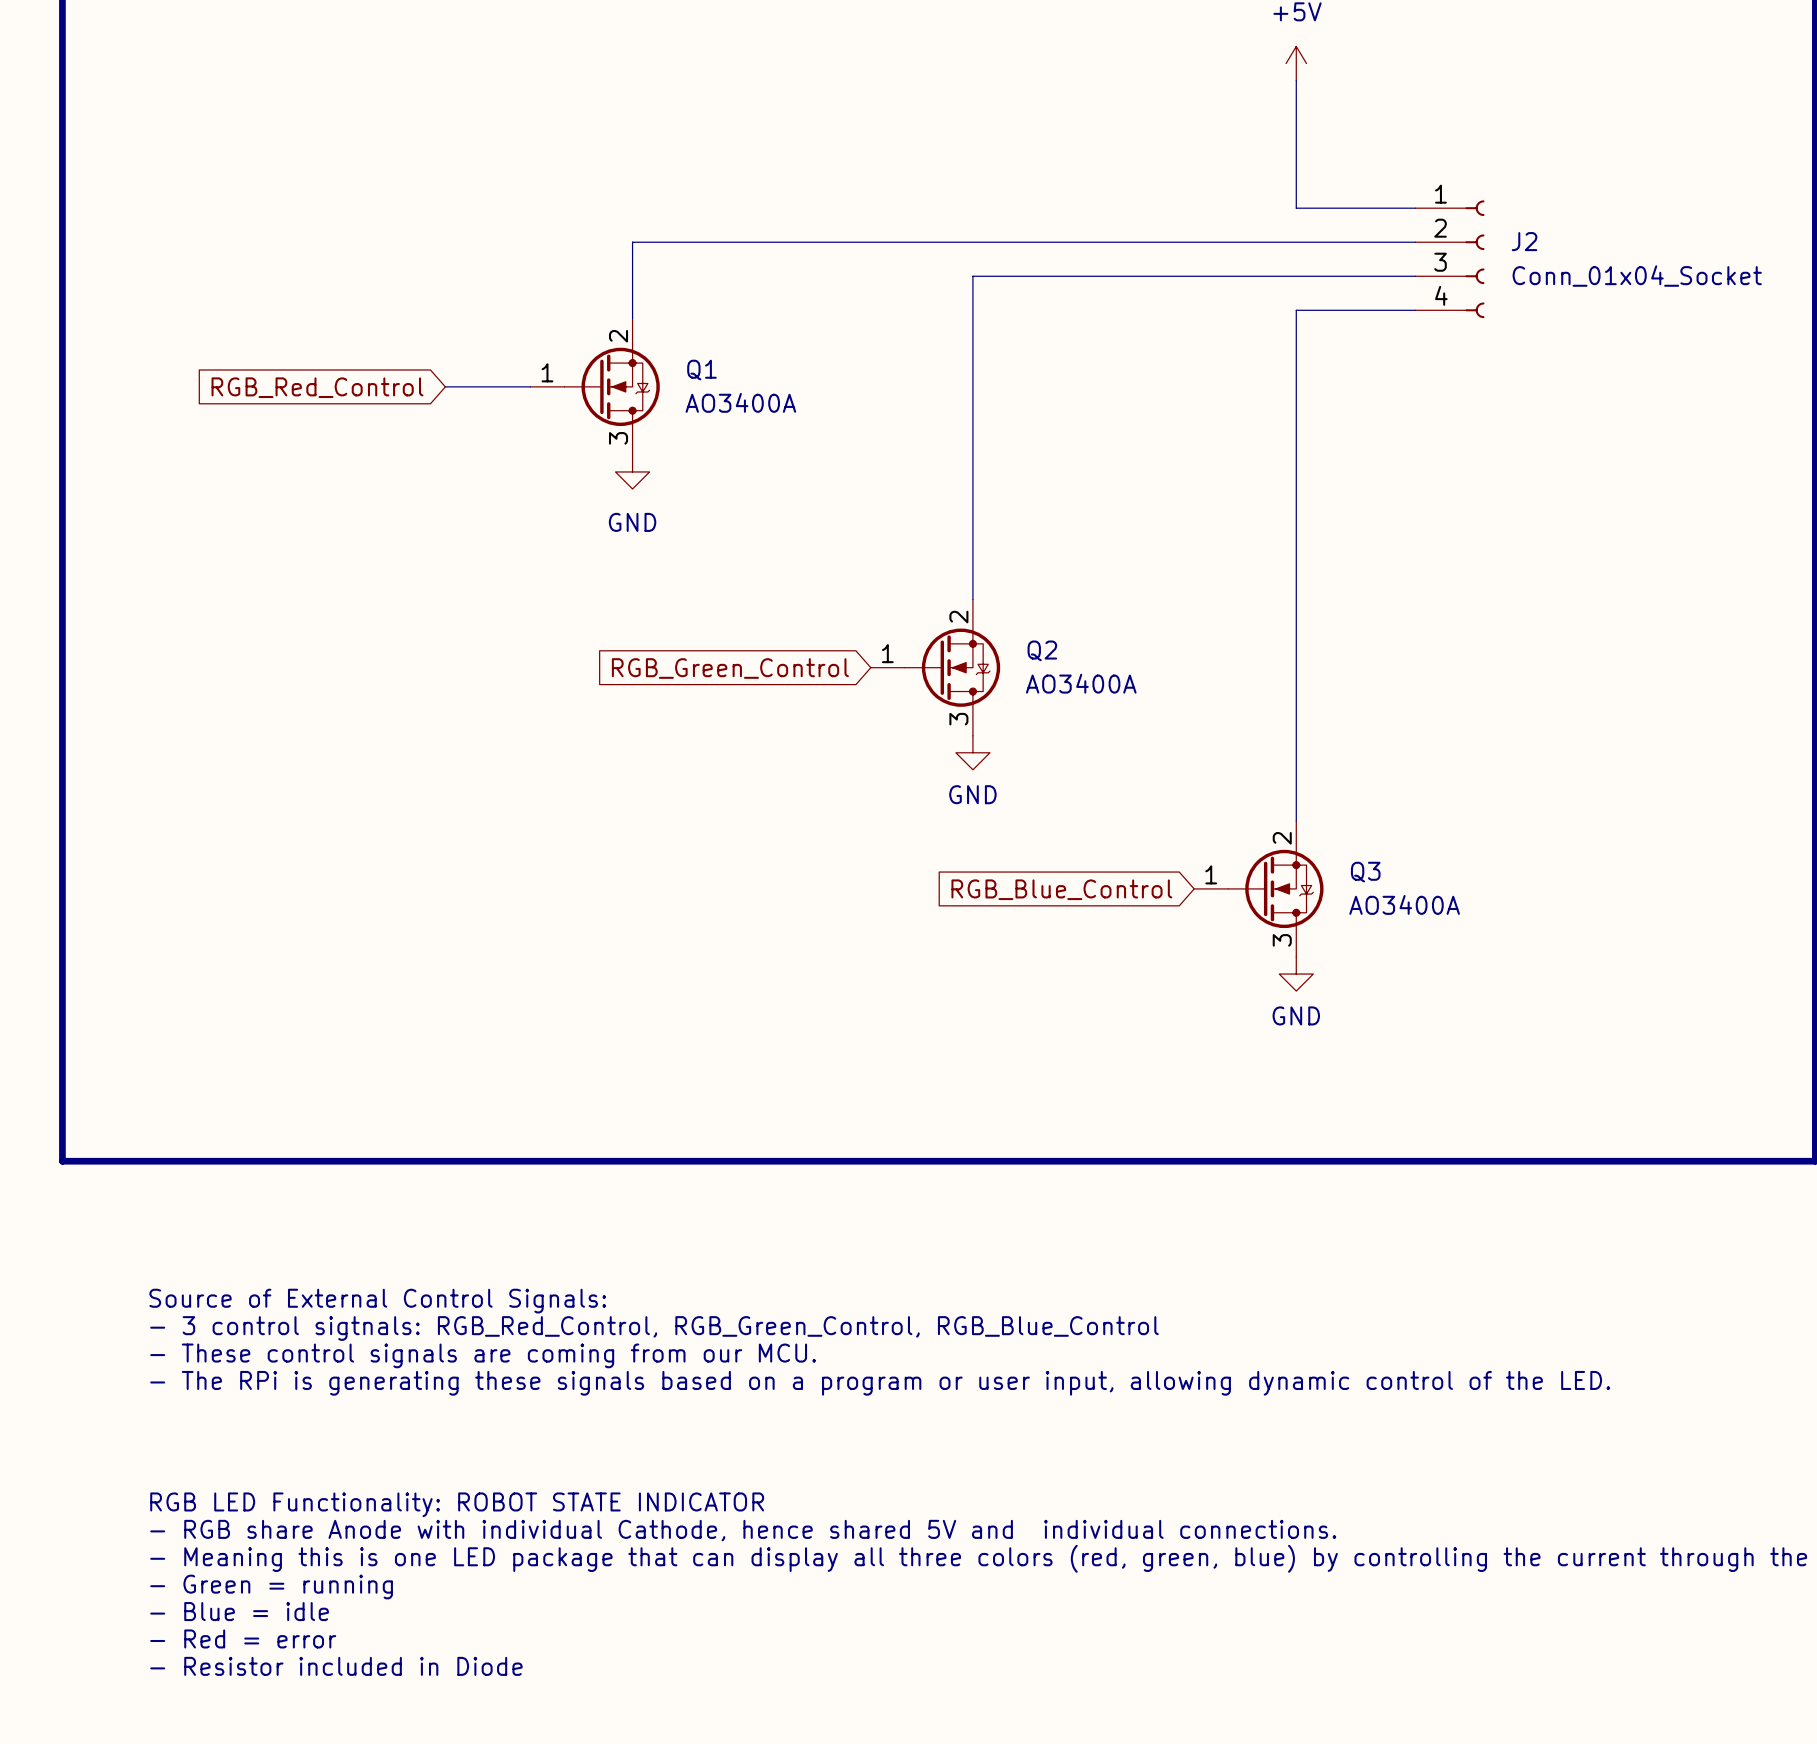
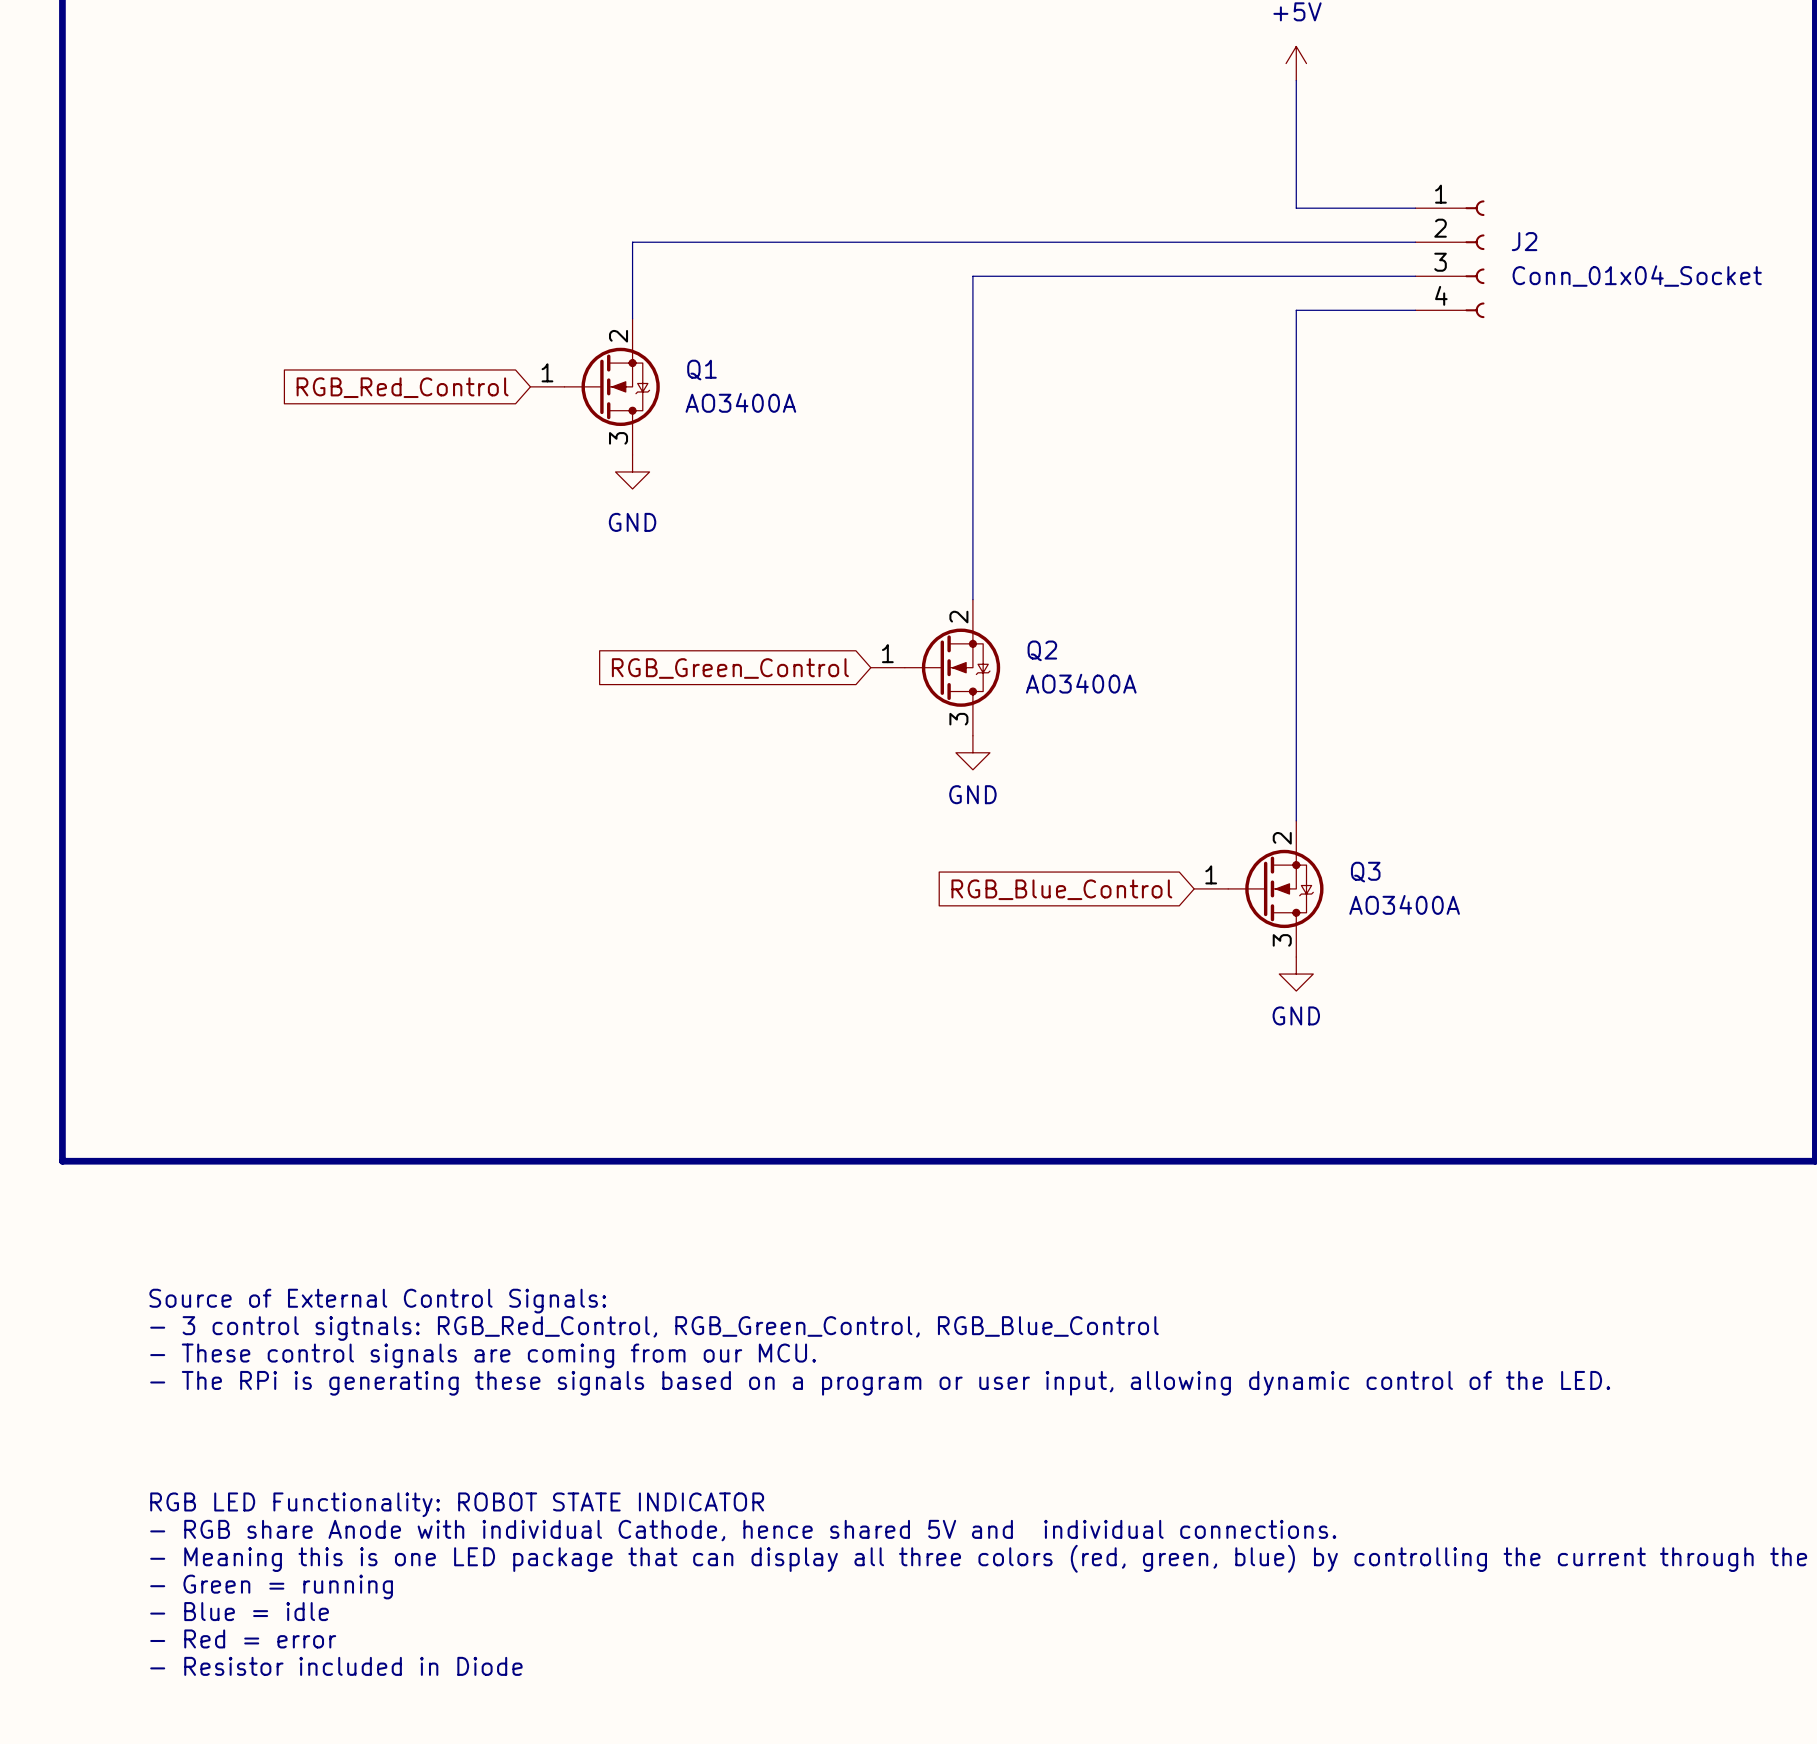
wire: (445, 386) (530, 386) -> none
global label position: RGB_Red_Control (317, 387) -> RGB_Red_Control (402, 387)

